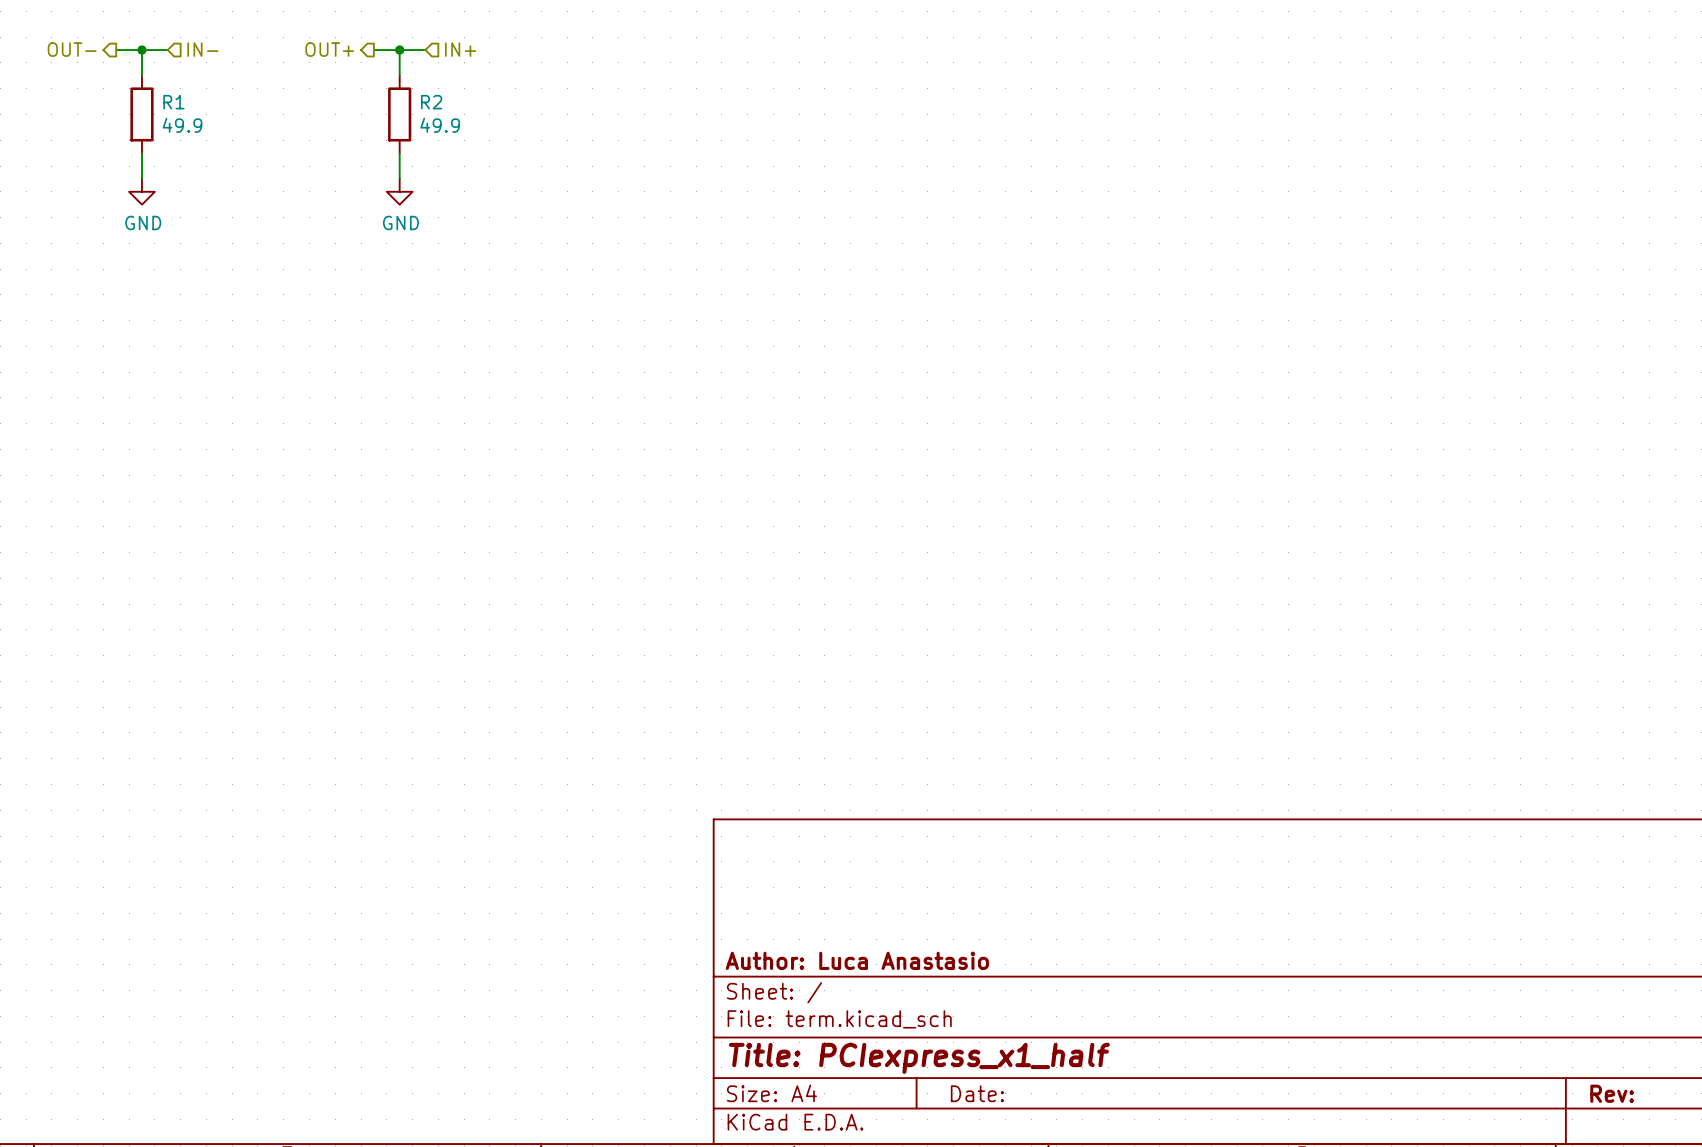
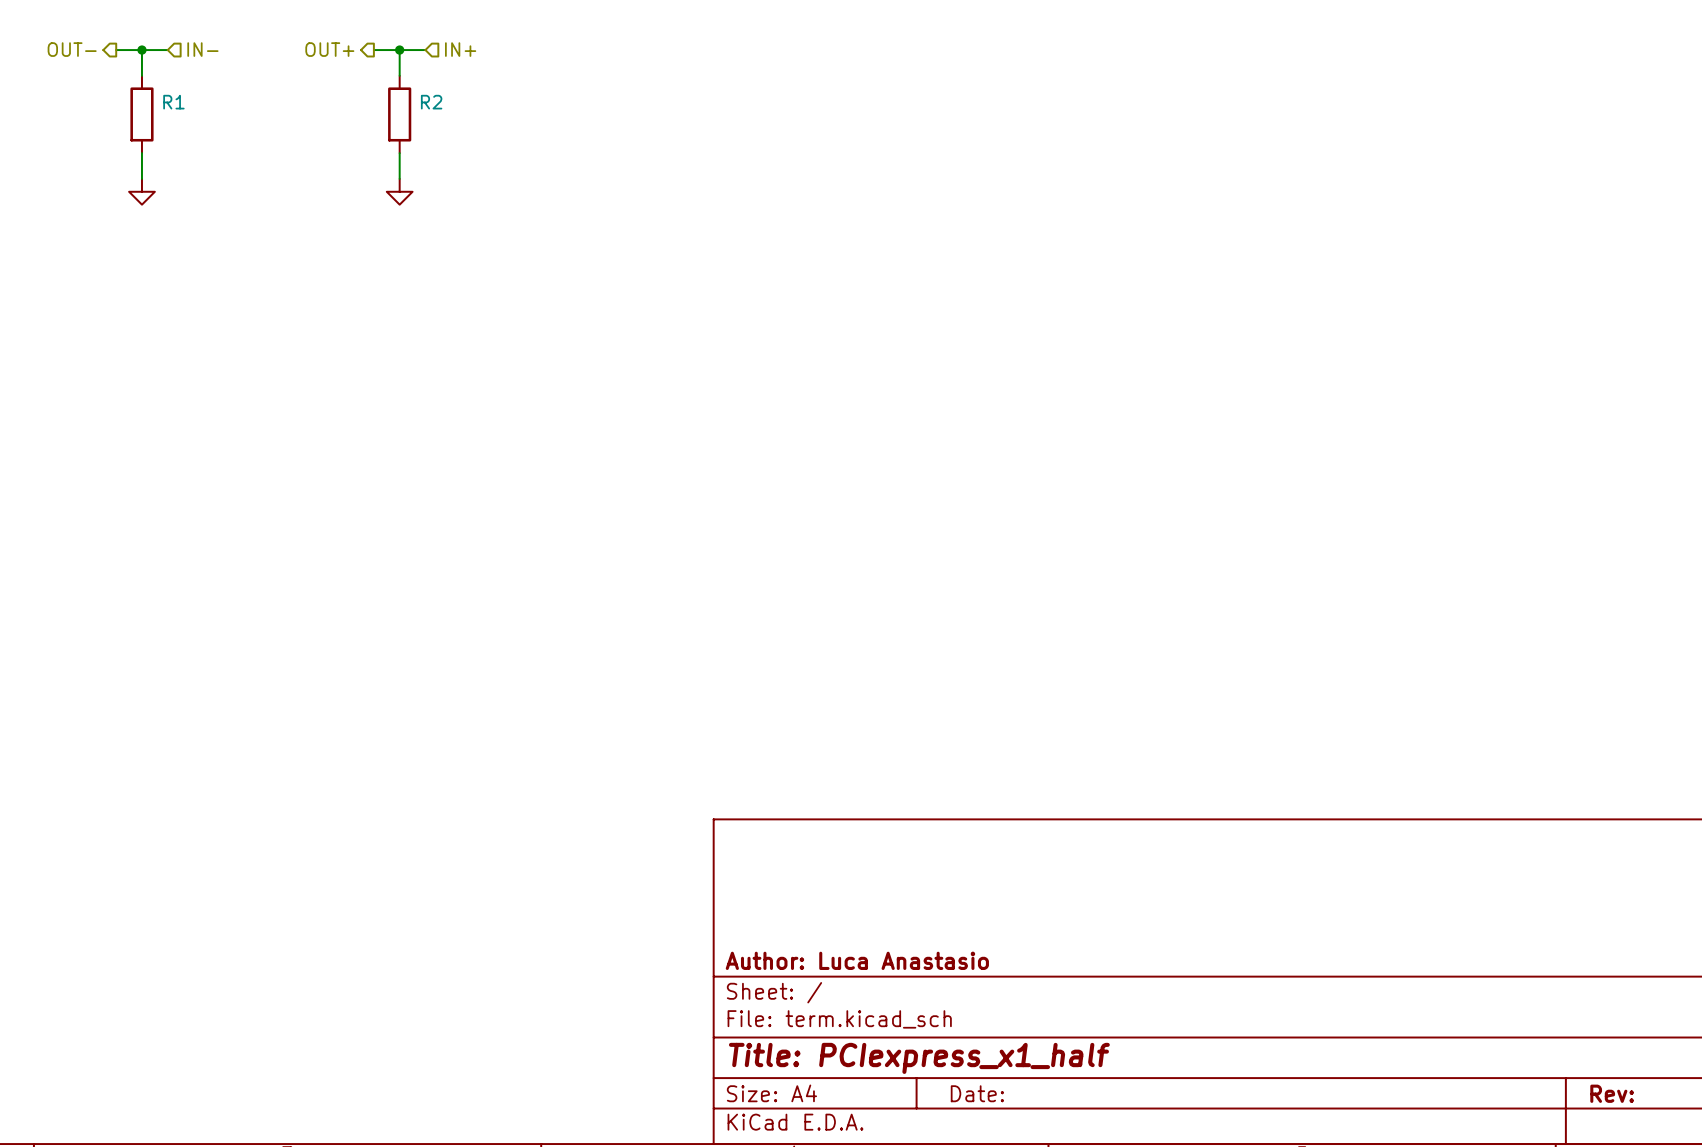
R1 value: 49.9 (182, 125) -> none
R2 value: 49.9 (440, 125) -> none
power symbol text: GND (143, 222) -> none
power symbol text: GND (400, 222) -> none

